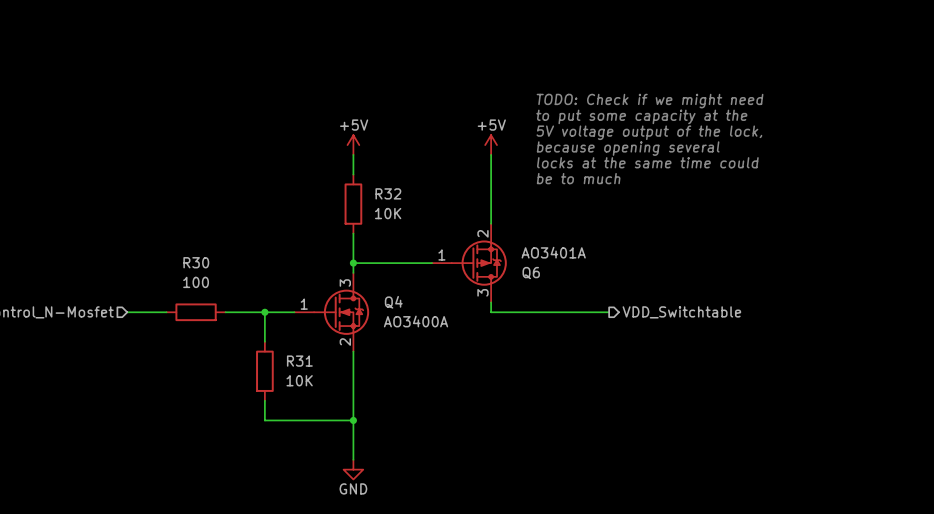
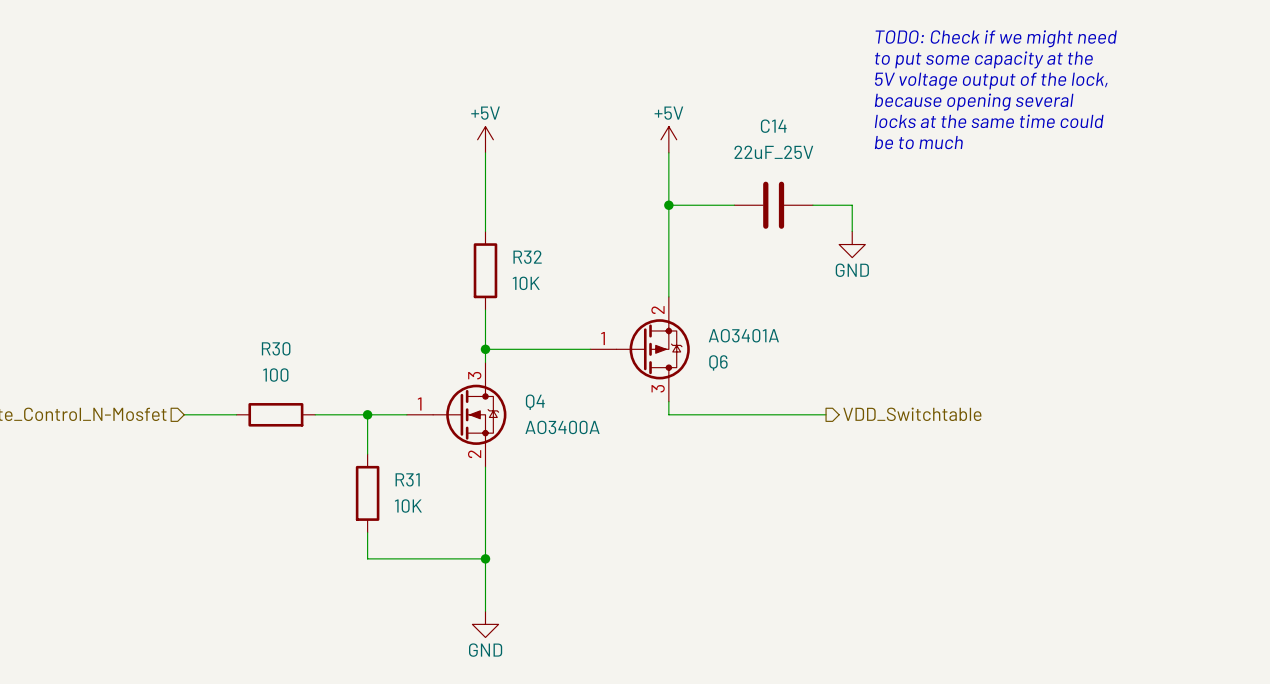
text position: TODO: Check if we might need (650, 101) -> TODO: Check if we might need (996, 38)
wire: none -> (668, 152) (668, 205) (734, 205)
text position: to put some capacity at the (641, 116) -> to put some capacity at the (983, 59)
text position: 5V voltage output of the lock, (649, 132) -> 5V voltage output of the lock, (991, 81)
power symbol position: +5V (353, 145) -> +5V (485, 139)
power symbol position: +5V (491, 145) -> +5V (668, 139)
text position: because opening several (628, 148) -> because opening several (974, 102)
junction: none -> (668, 205)
C14: none -> 22uF_25V (773, 205)
wire: none -> (812, 205) (852, 205) (852, 231)
text position: locks at the same time could (647, 162) -> locks at the same time could (989, 121)
text position: be to much (578, 178) -> be to much (918, 142)
power symbol: none -> GND (852, 244)

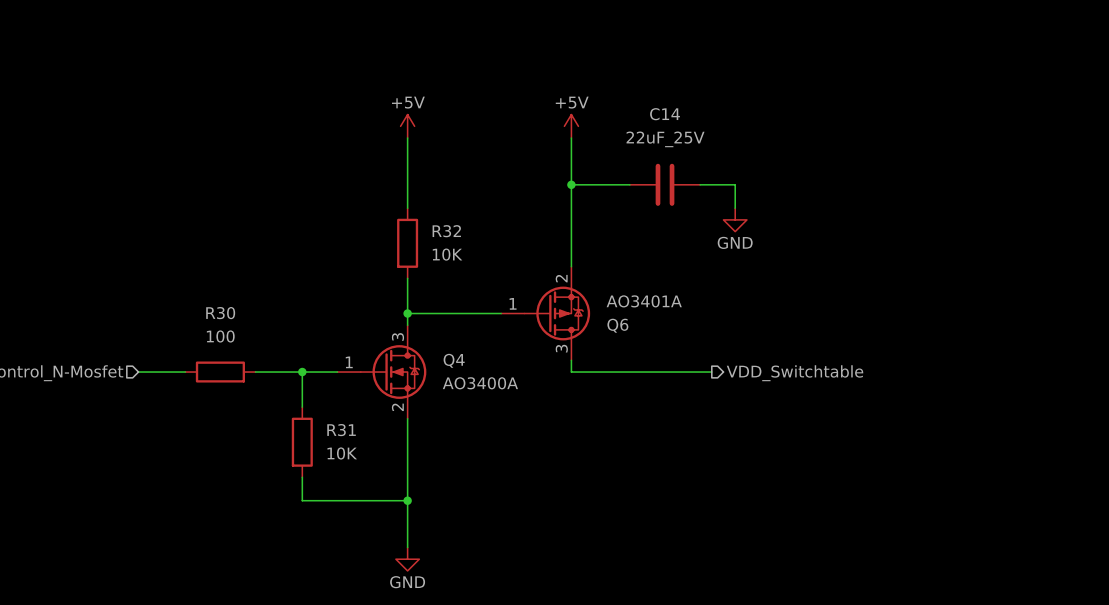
text: TODO: Check if we might need (996, 38) -> none
text: to put some capacity at the (983, 59) -> none
text: 5V voltage output of the lock, (991, 81) -> none
text: because opening several (974, 102) -> none
text: locks at the same time could (989, 121) -> none
text: be to much (918, 142) -> none

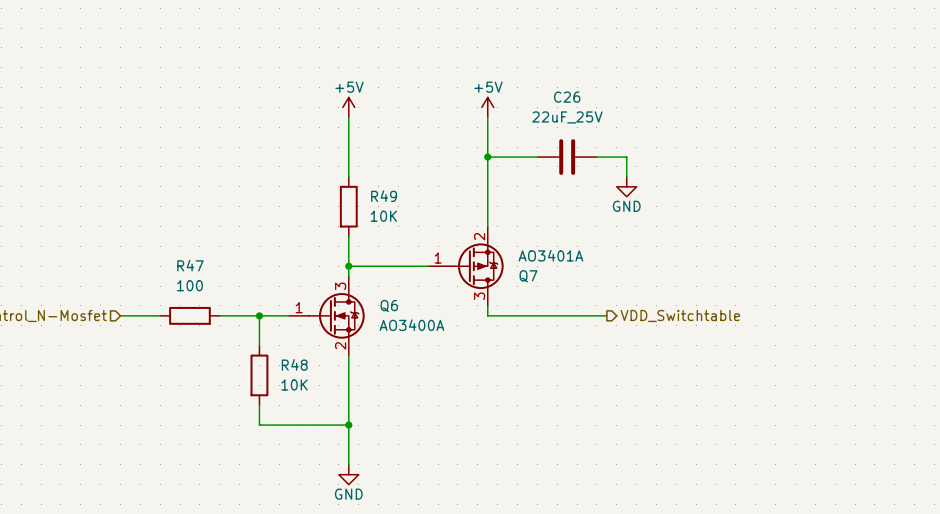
C14 name: C14 (665, 114) -> C26 (567, 97)
R32 name: R32 (446, 231) -> R49 (384, 196)
R30 name: R30 (220, 313) -> R47 (190, 265)
Q6 name: Q6 (617, 325) -> Q7 (528, 276)
Q4 name: Q4 (454, 360) -> Q6 (389, 306)
R31 name: R31 (341, 430) -> R48 (294, 364)

